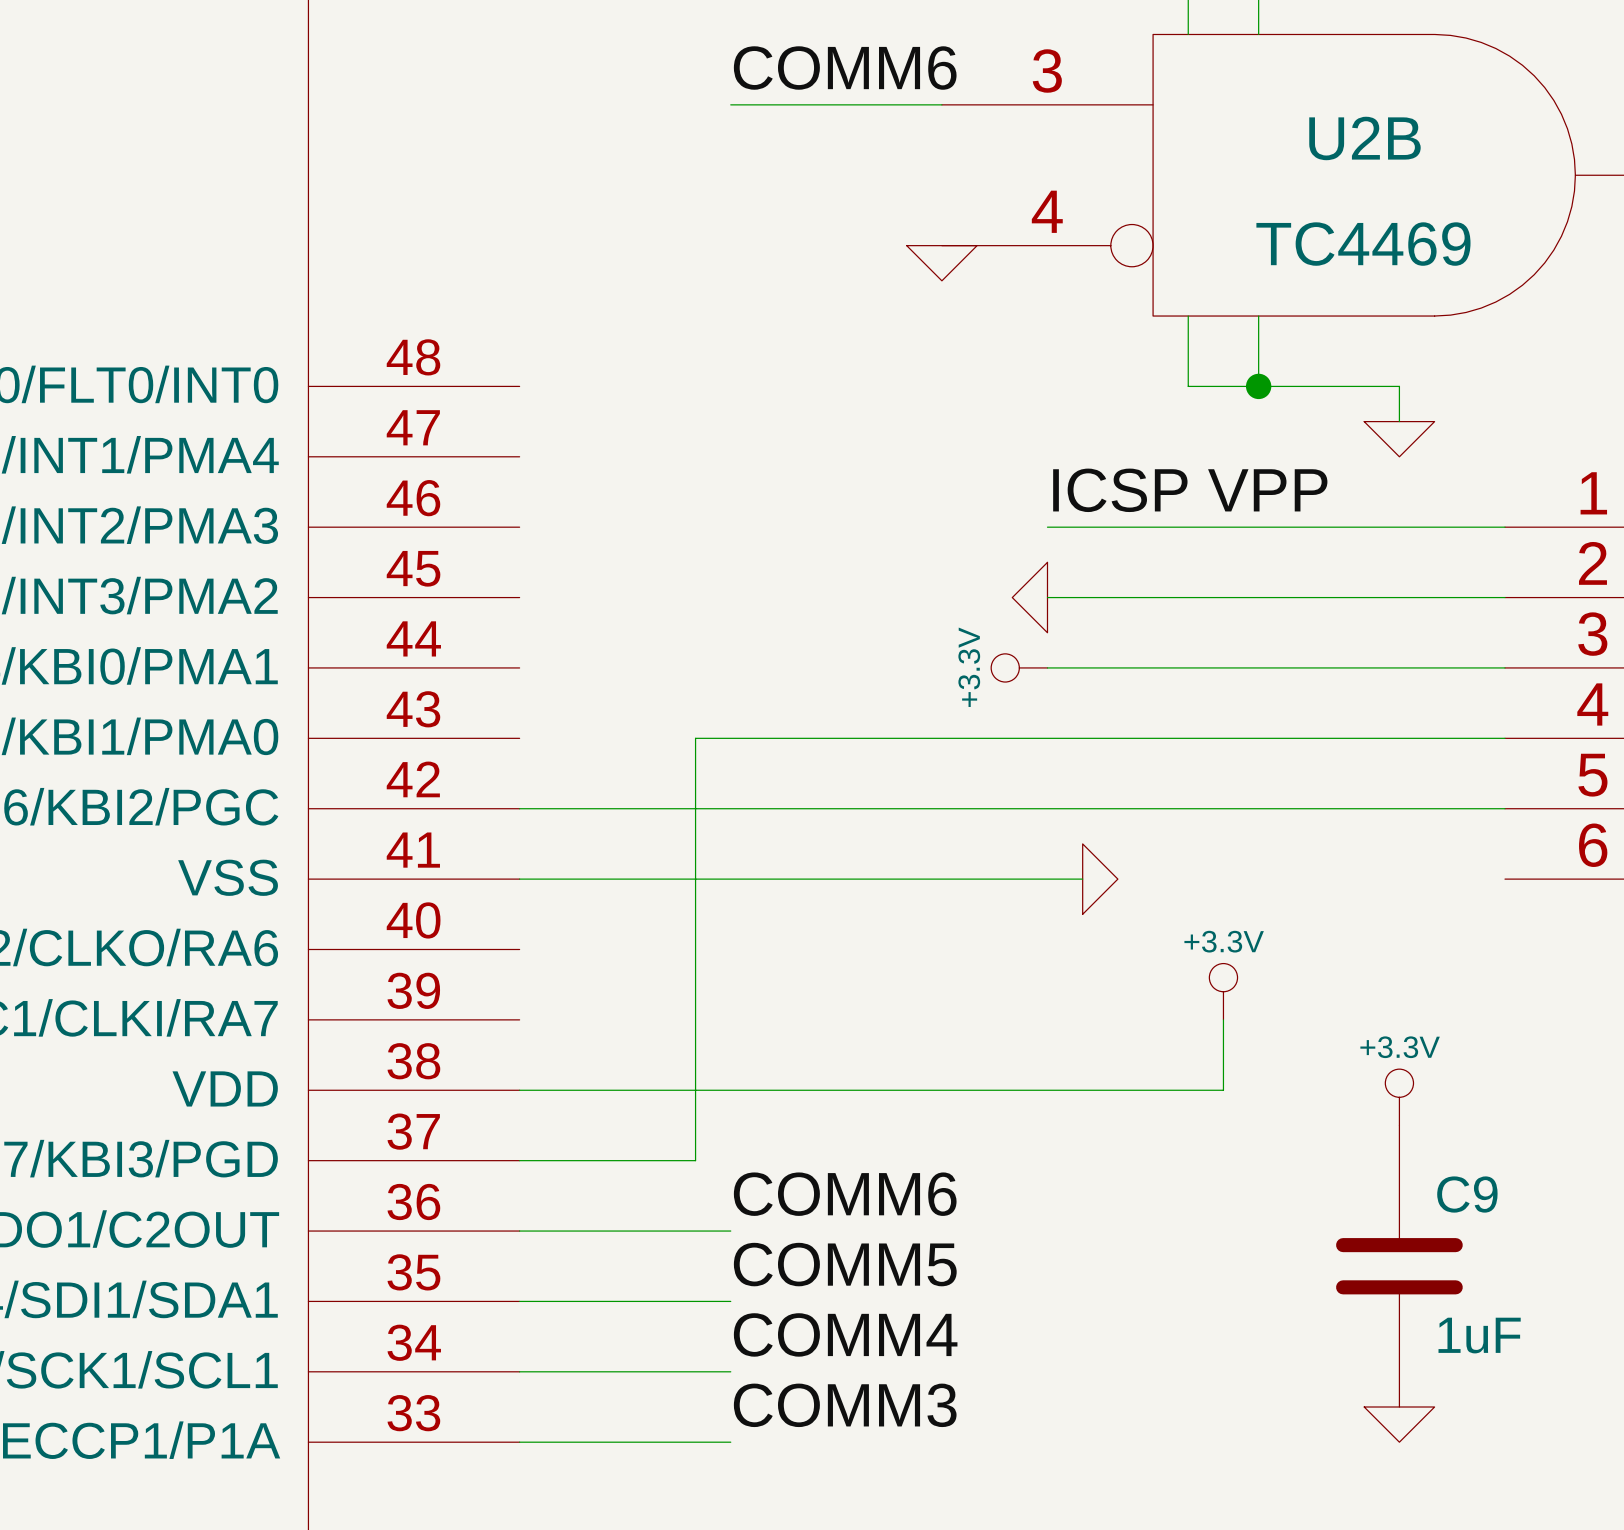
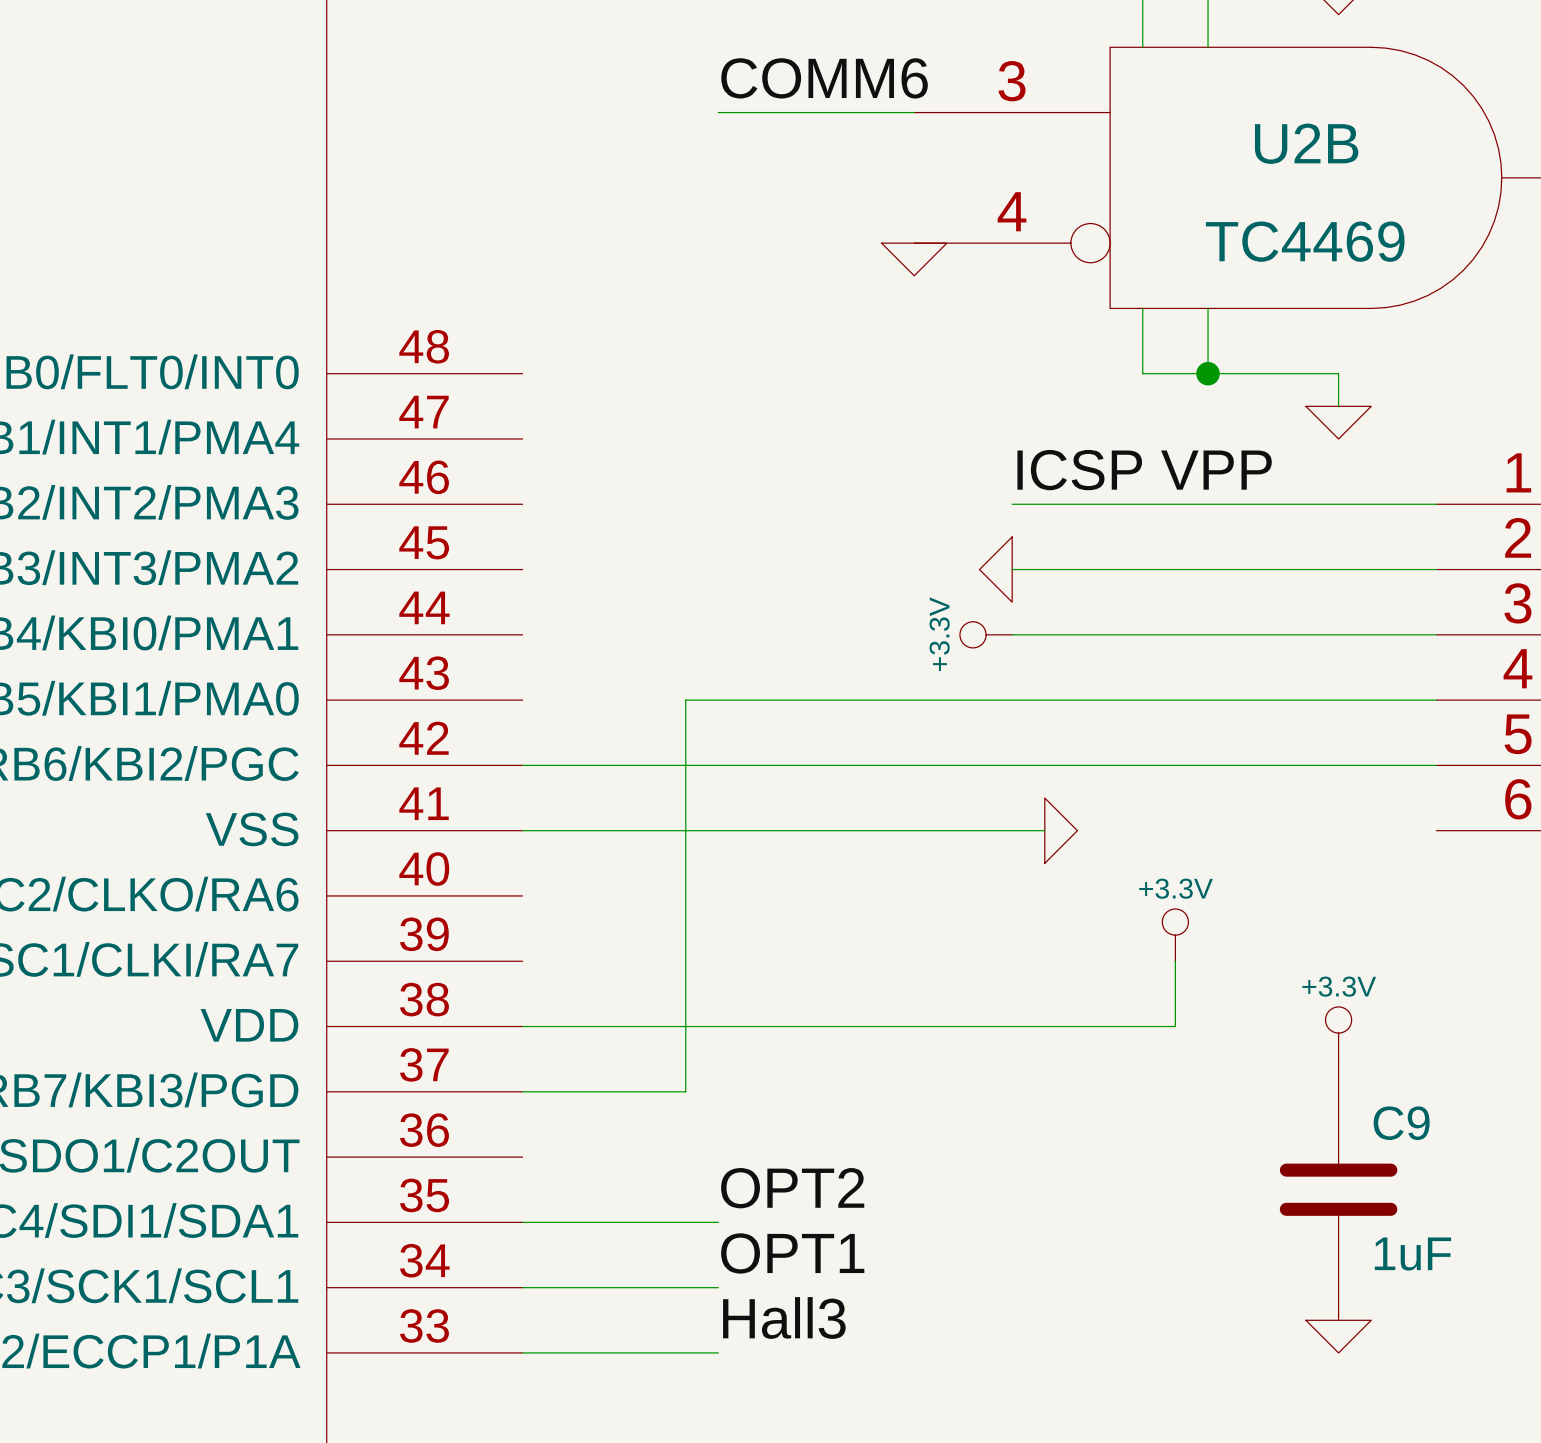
label: COMM6 (845, 1194) -> none
wire: (519, 1231) (730, 1231) -> none
label: COMM5 (845, 1264) -> OPT2 (792, 1188)
label: COMM4 (845, 1334) -> OPT1 (792, 1253)
label: COMM3 (845, 1405) -> Hall3 (784, 1318)

